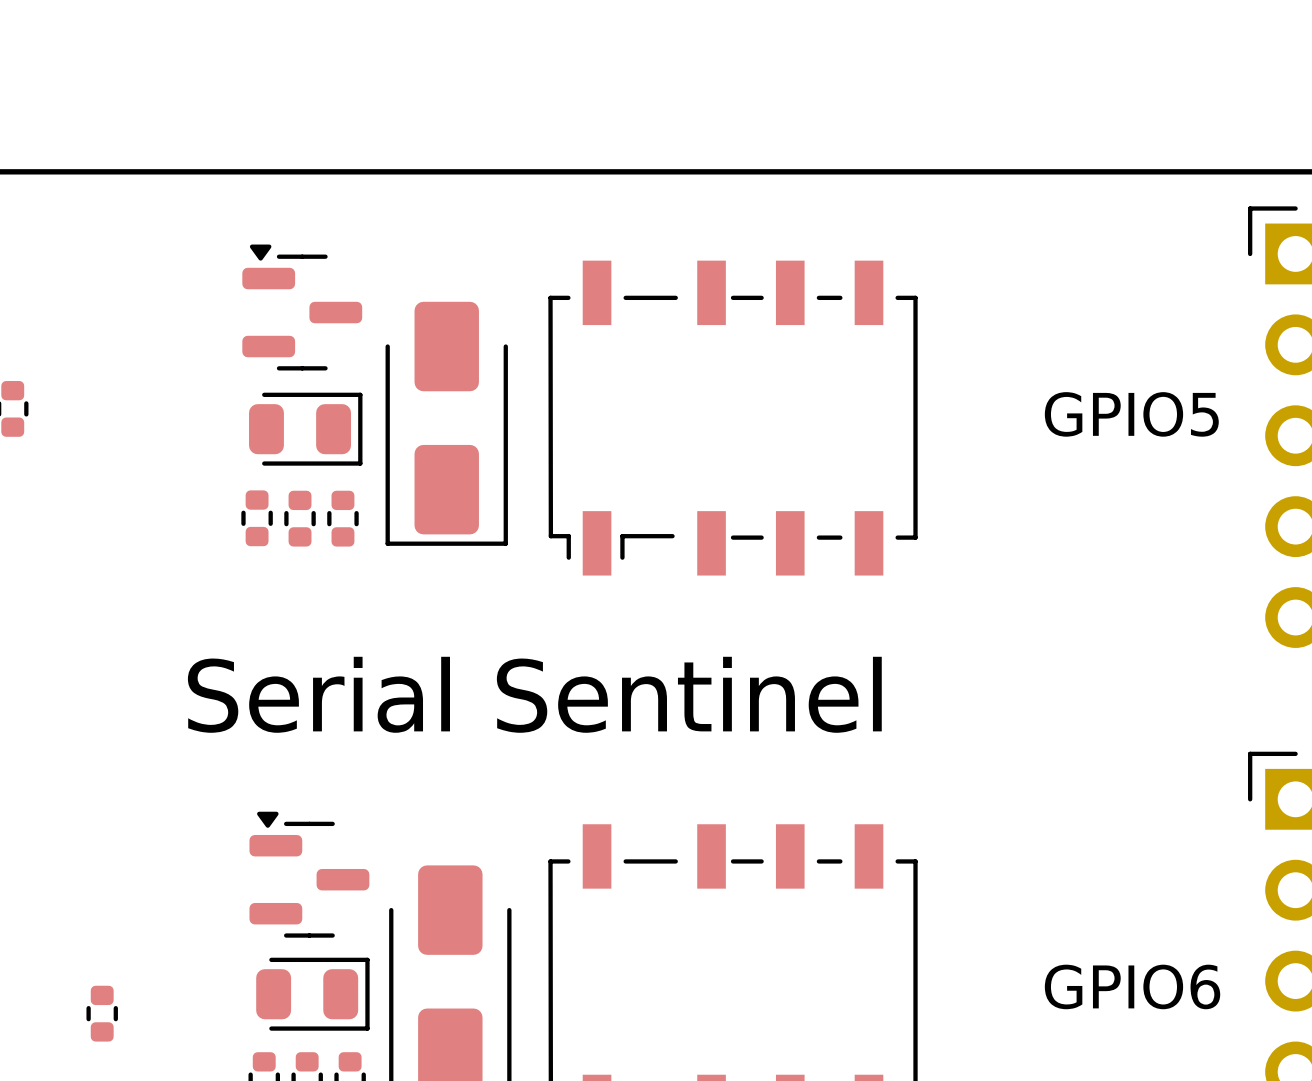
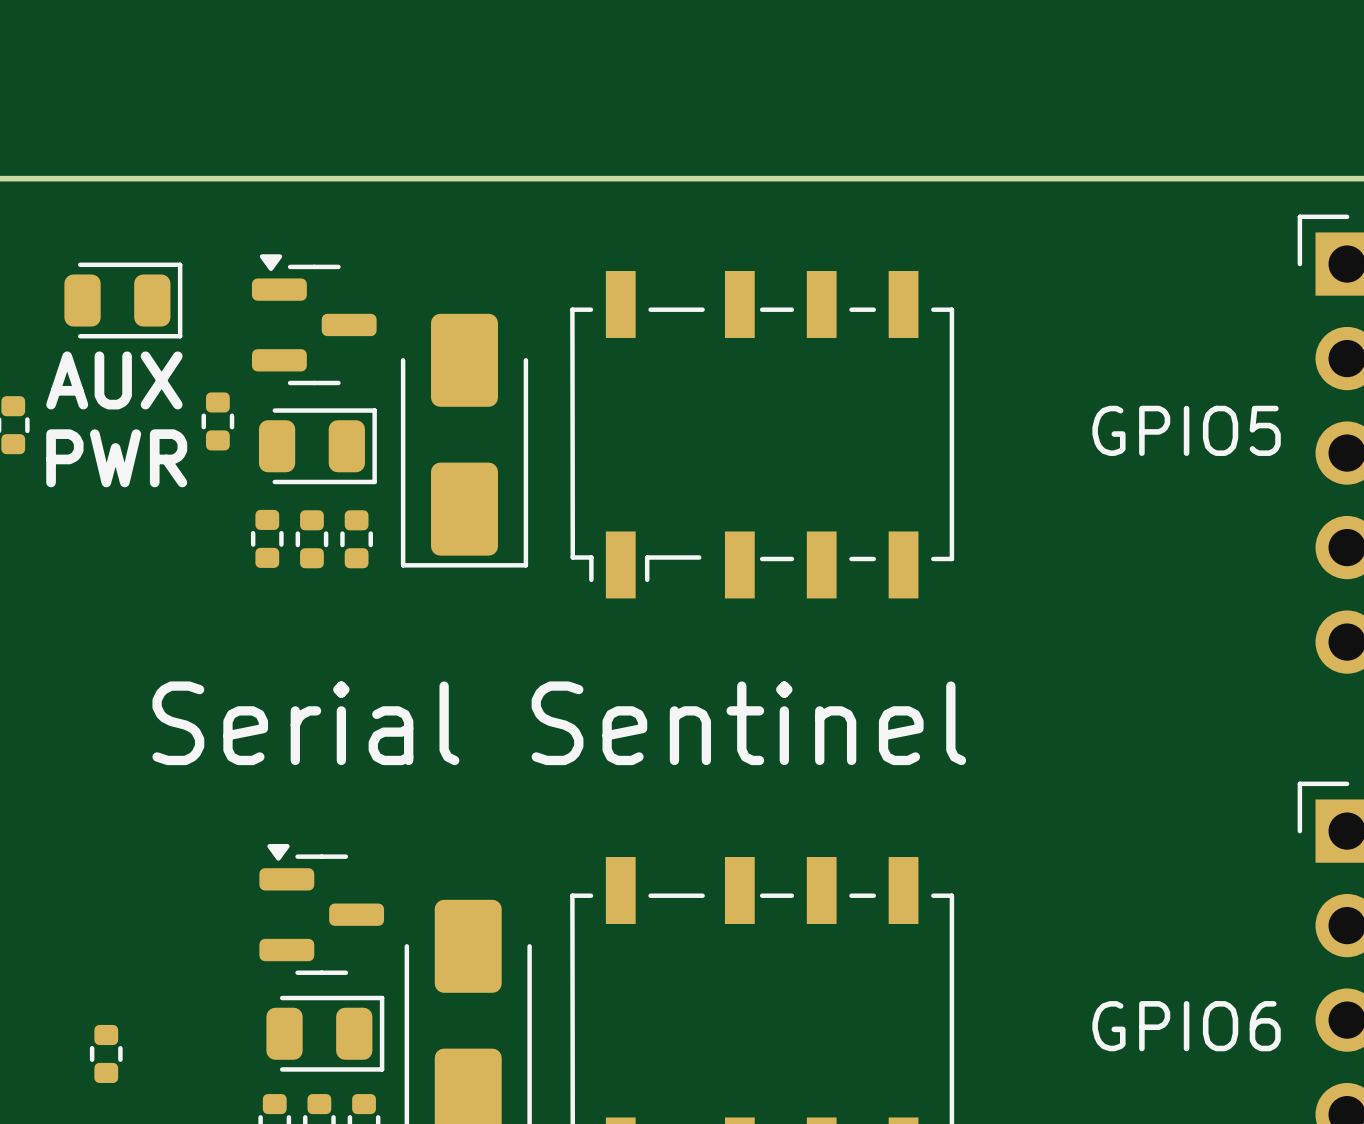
part: none -> (123, 300)
text: none -> AUX (114, 380)
part: none -> (217, 421)
text: none -> PWR (116, 458)

